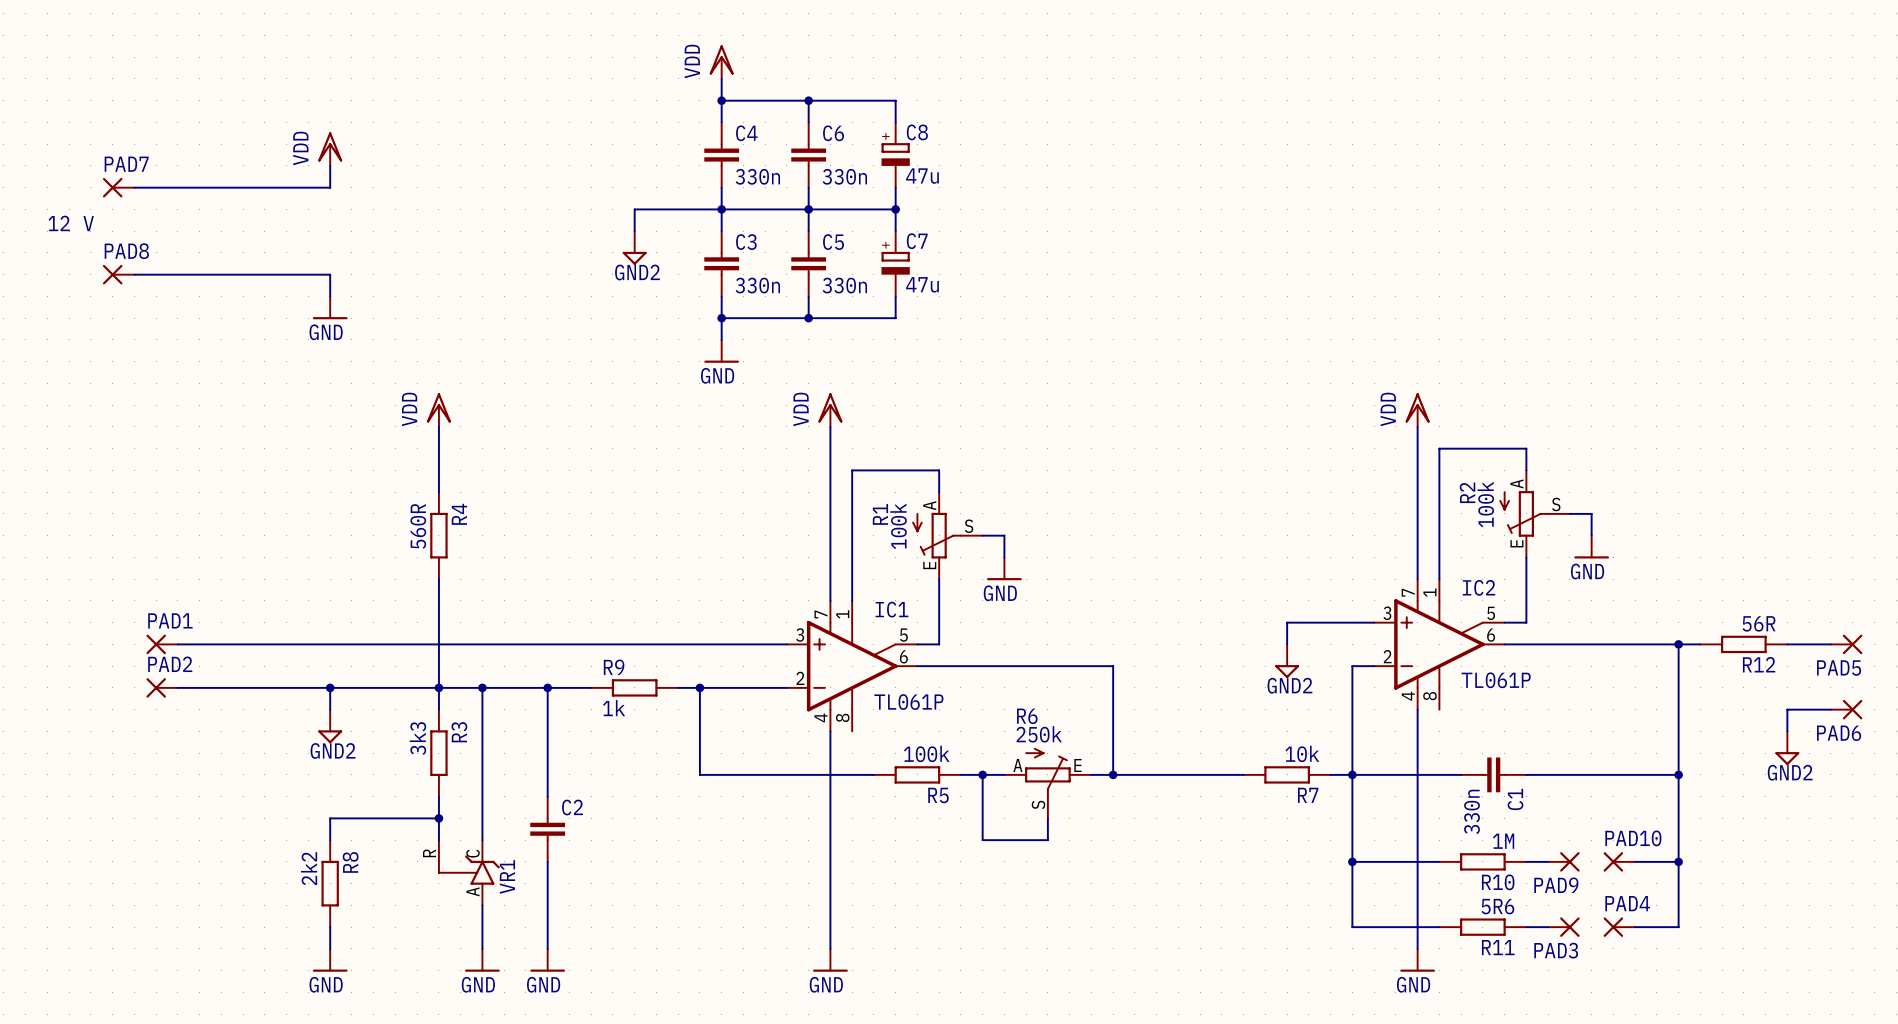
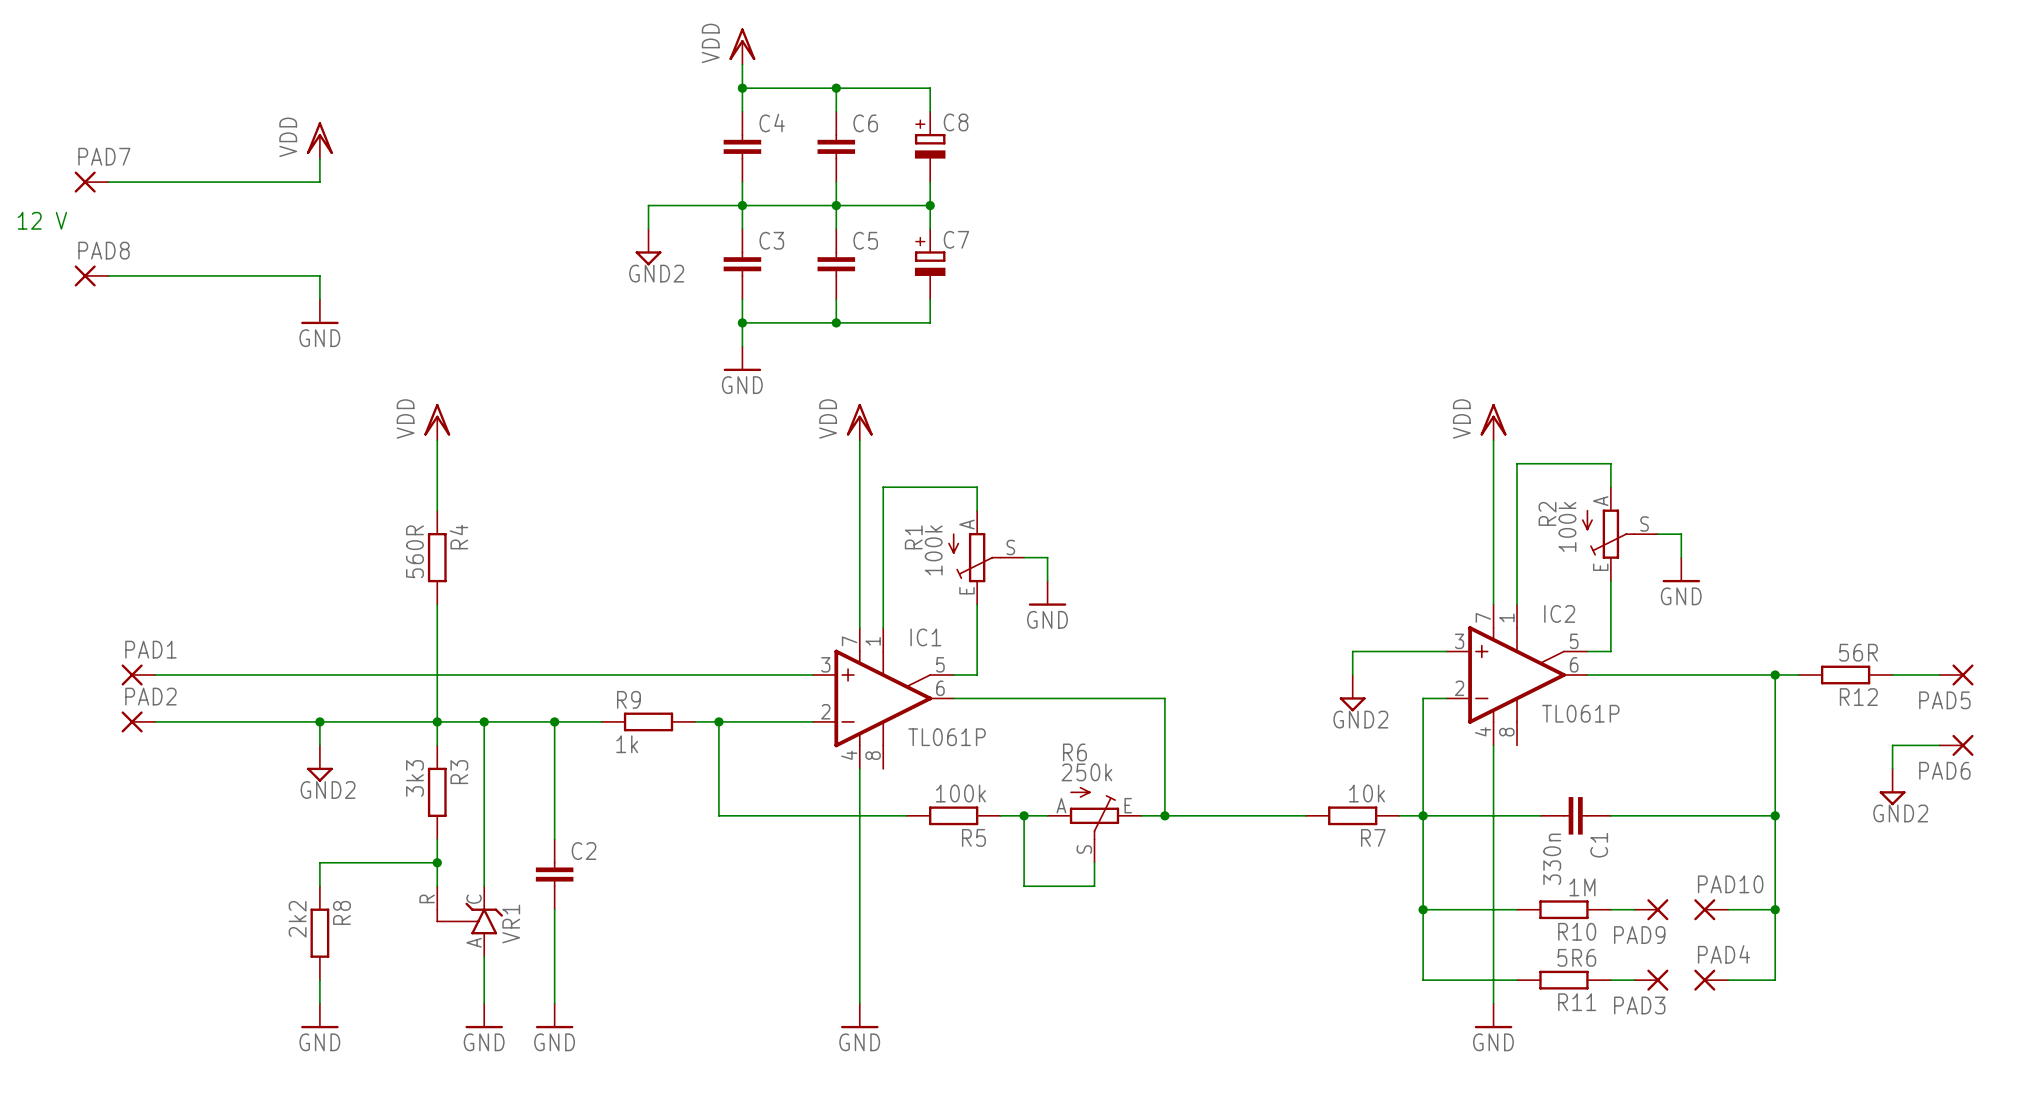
C4 value: 330n (757, 176) -> none
C6 value: 330n (844, 176) -> none
C8 value: 47u (922, 176) -> none
C7 value: 47u (922, 284) -> none
C3 value: 330n (757, 285) -> none
C5 value: 330n (844, 285) -> none

